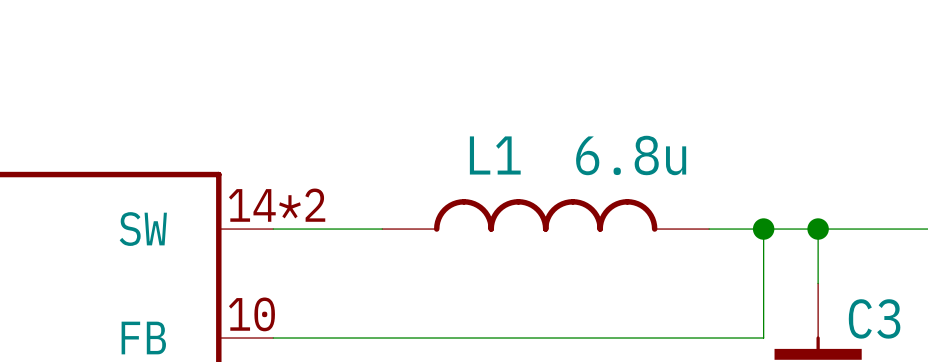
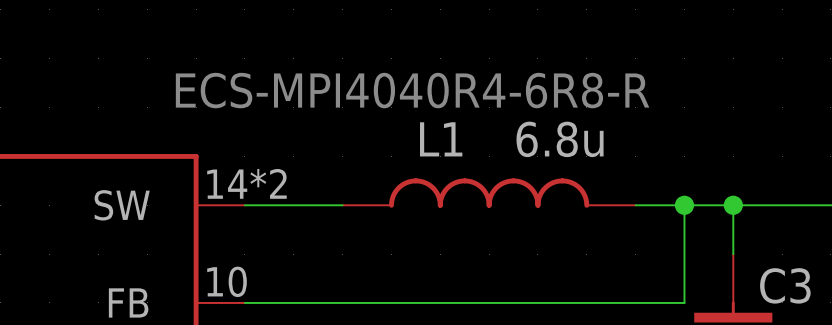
text: none -> ECS-MPI4040R4-6R8-R (412, 90)

